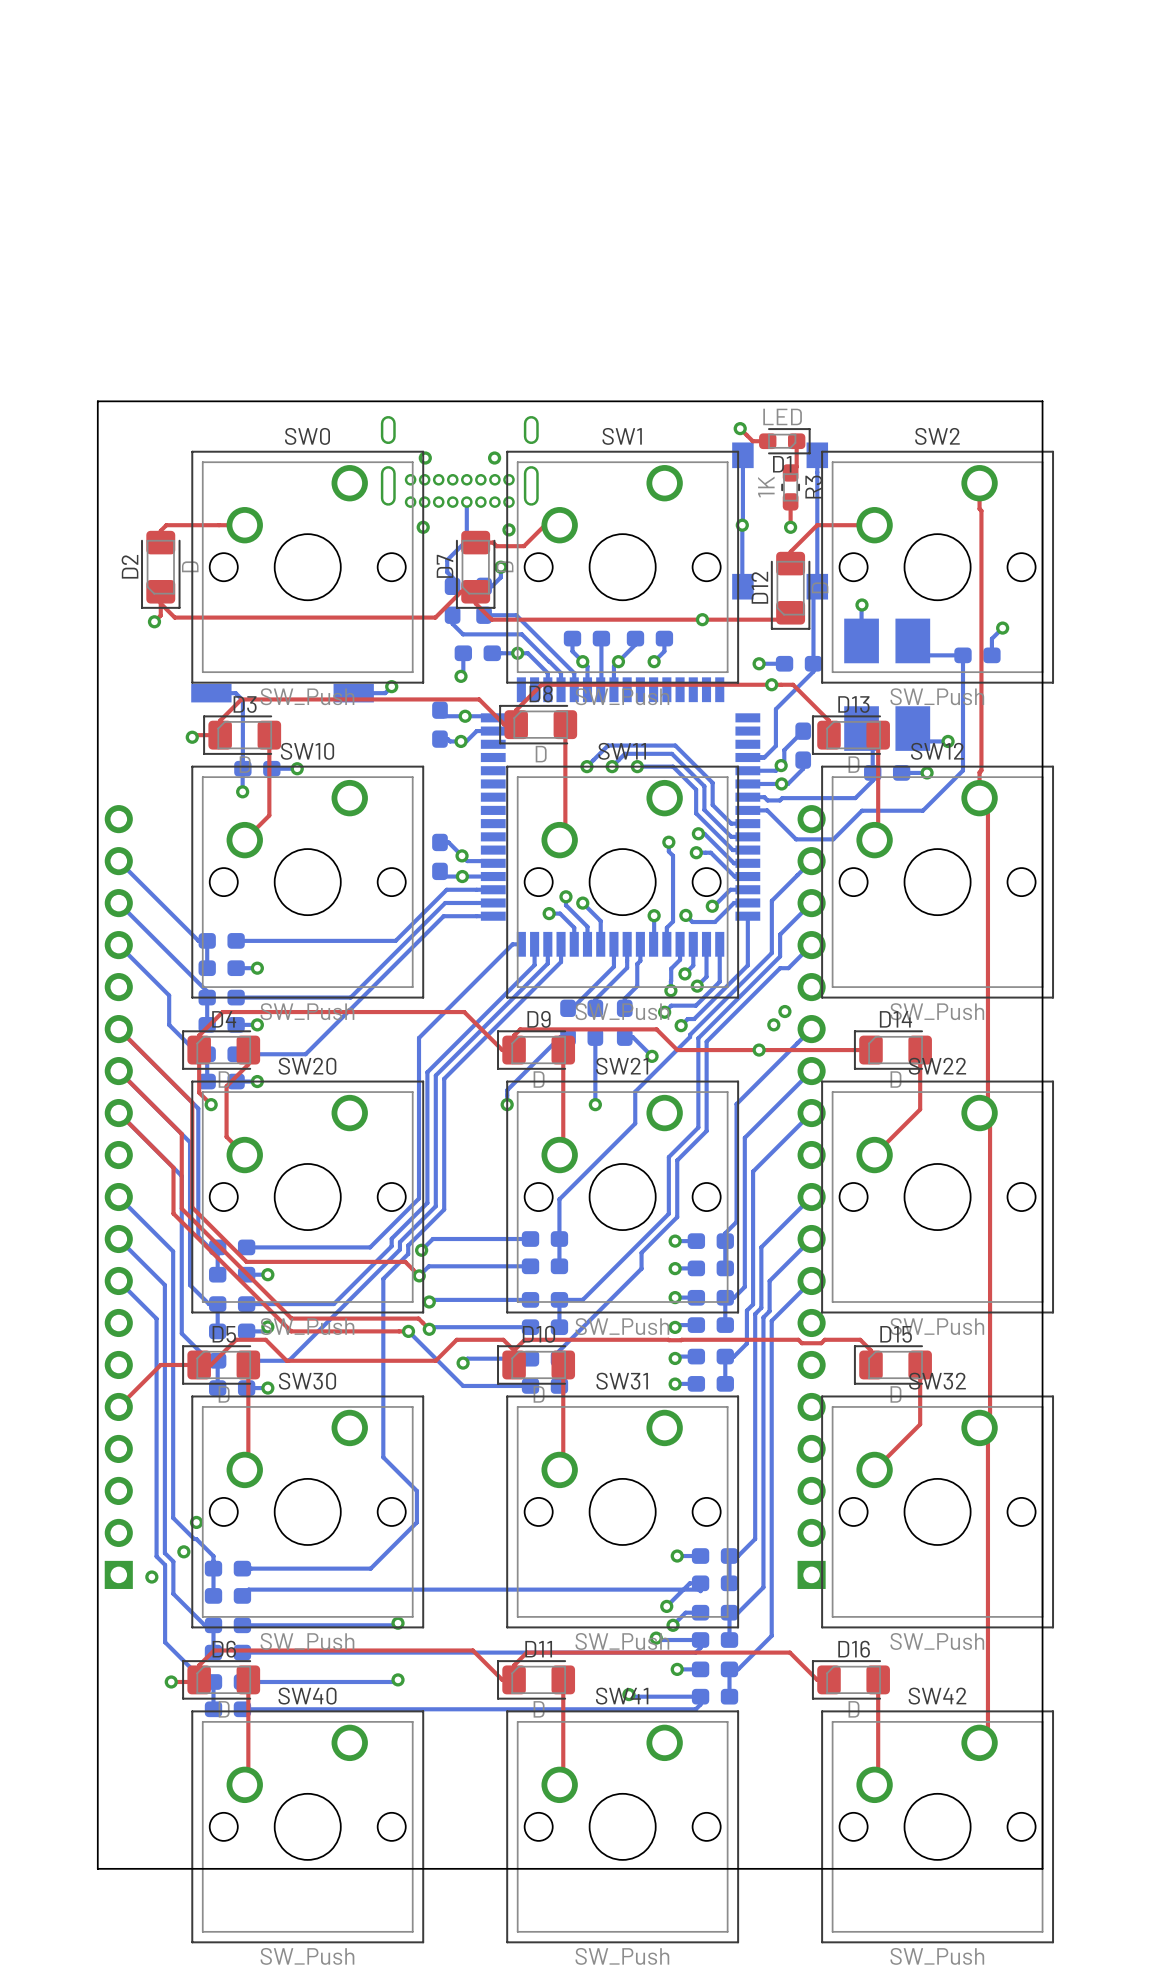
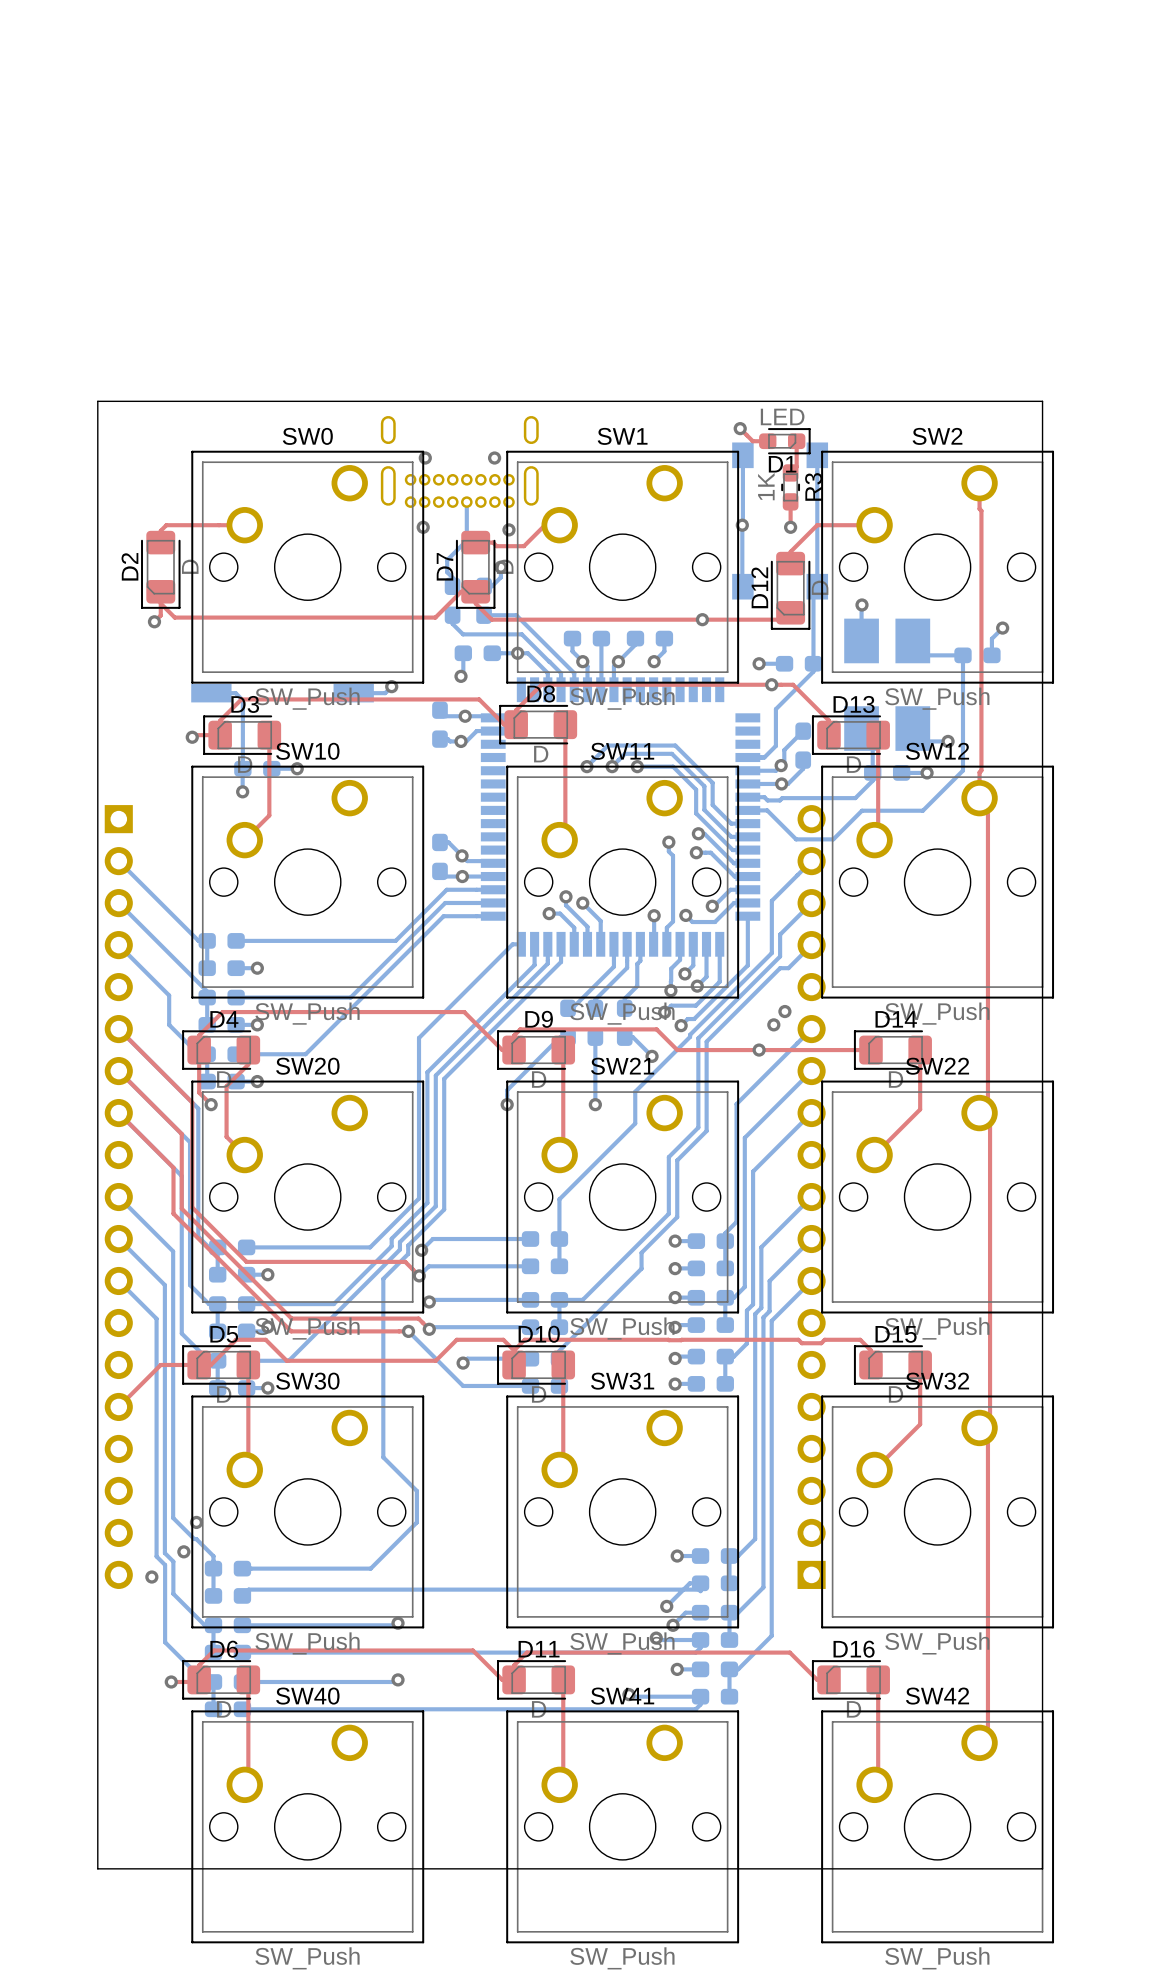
part rotation: 0° (118, 1197) -> 180° (118, 1197)

